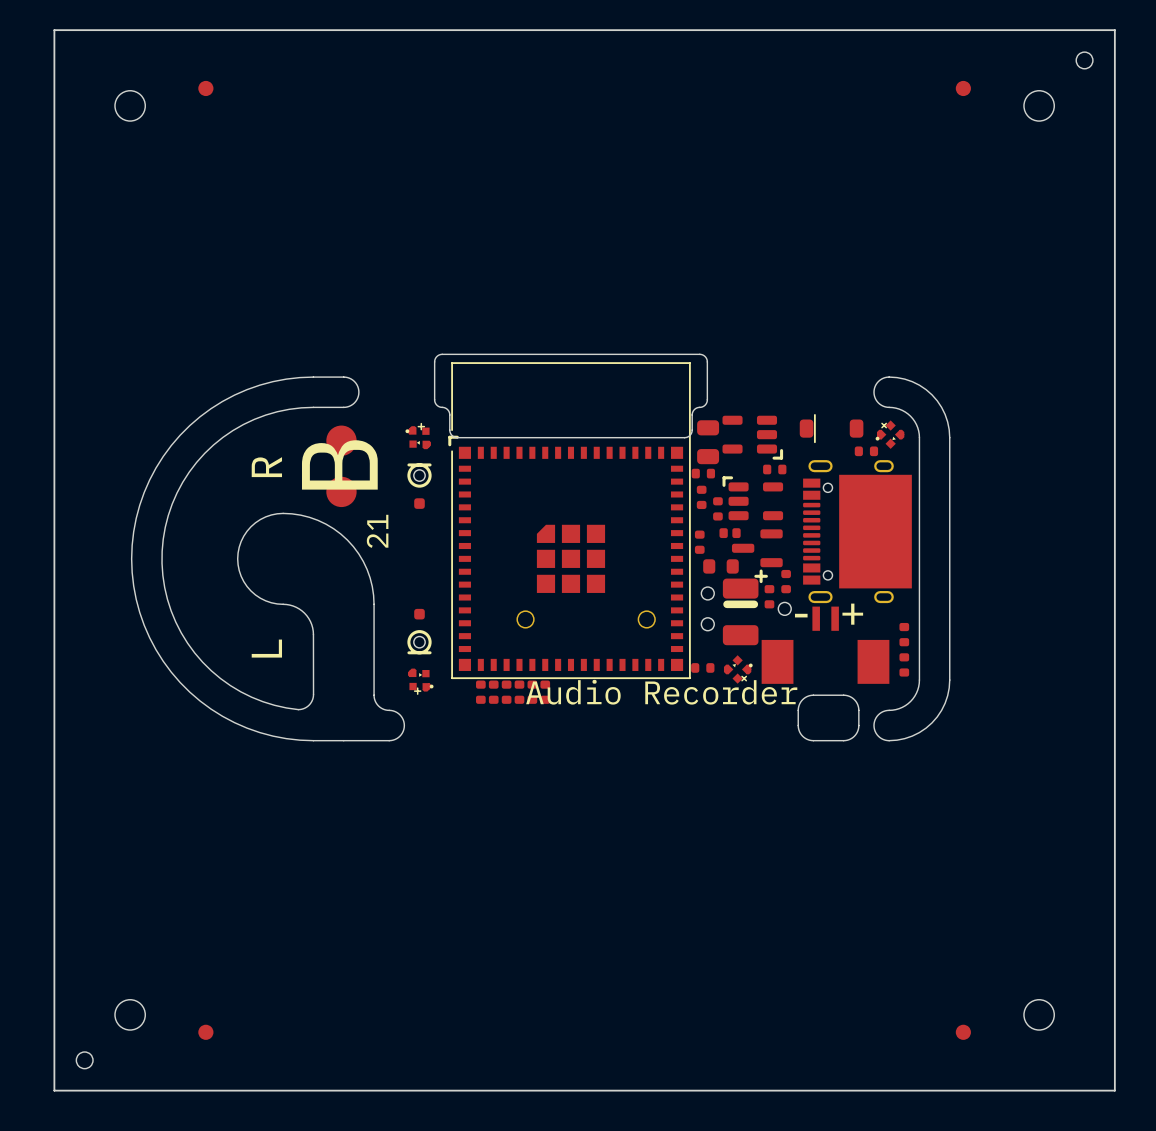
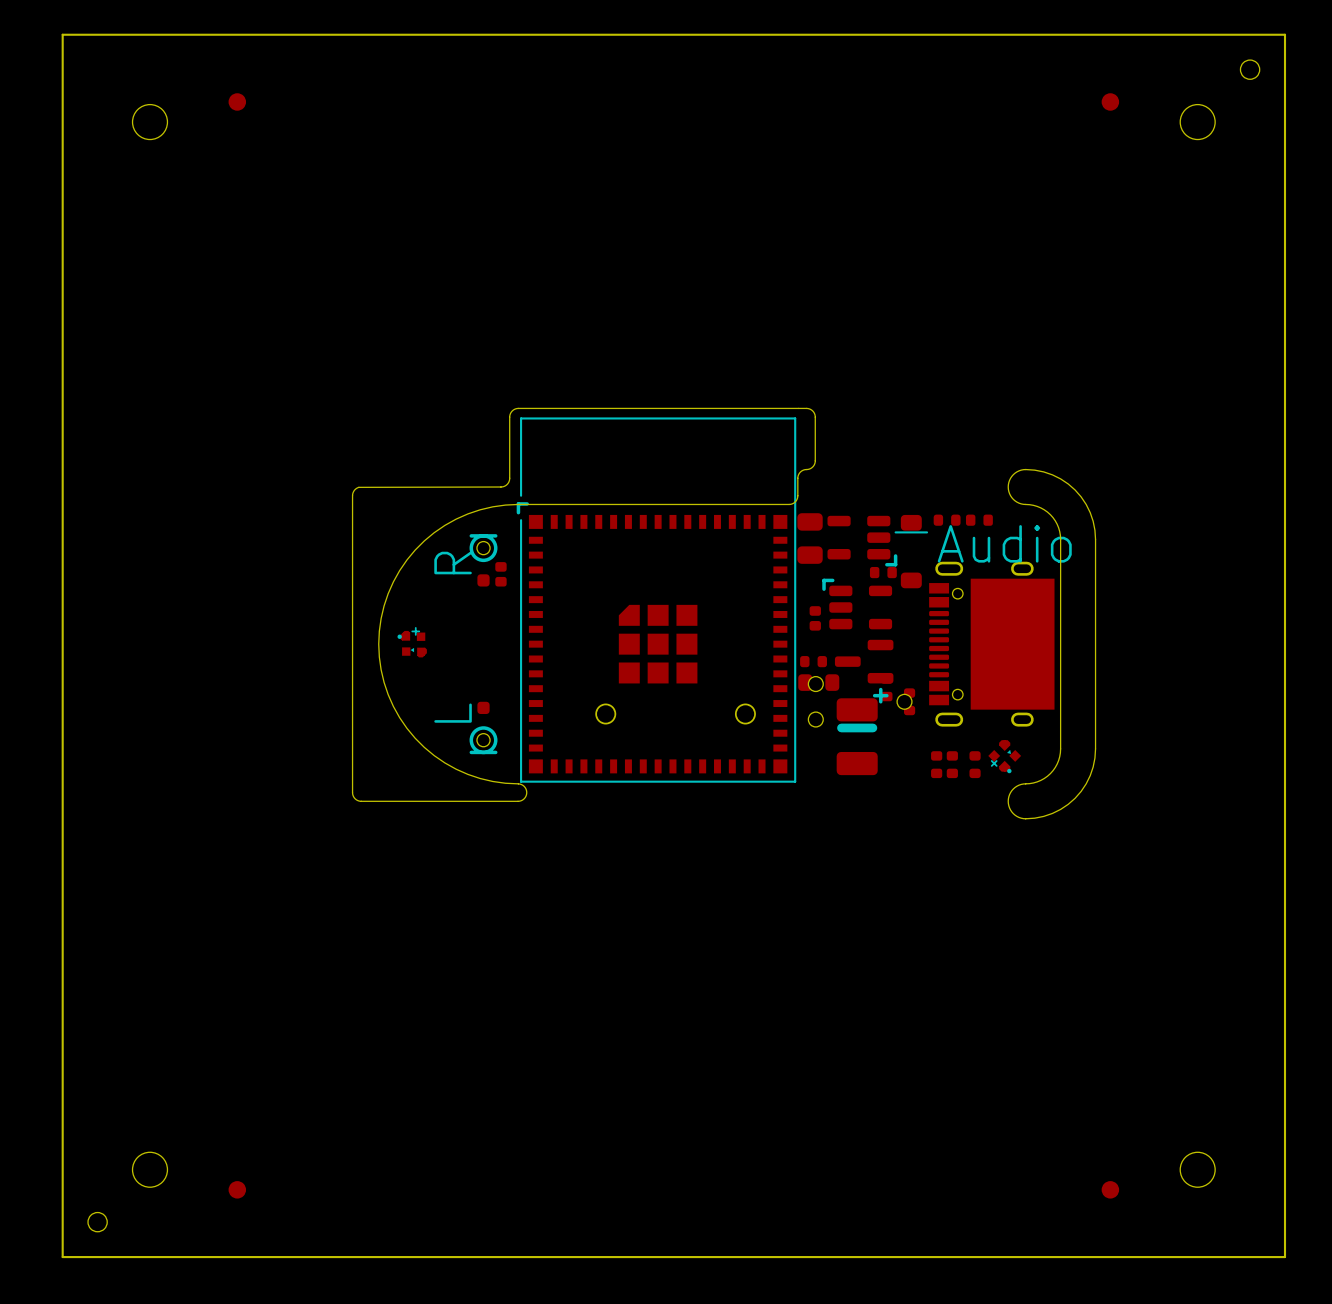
board edge: (449, 354) (439, 354) (434, 359) (434, 400) (437, 405) (448, 411) (450, 432) (452, 436) (457, 437) -> (518, 408) (513, 410) (509, 416) (509, 478) (505, 485) (358, 487) (353, 492) (352, 792) (356, 800) (518, 801) (525, 797) (526, 789) (521, 784) (492, 781) (467, 774) (444, 762) (415, 738) (399, 717) (388, 694) (381, 669) (378, 644) (384, 605) (393, 581) (406, 559) (424, 540) (444, 525) (467, 513) (492, 506) (527, 504)
board edge: (313, 377) (343, 377) (351, 379) (358, 388) (356, 399) (352, 404) (345, 407) (301, 407) (265, 415) (232, 430) (204, 453) (182, 482) (168, 515) (162, 551) (164, 587) (171, 610) (181, 632) (194, 653) (211, 670) (230, 685) (251, 697) (274, 705) (303, 708) (310, 703) (313, 696) (313, 634) (310, 621) (304, 613) (296, 607) (265, 600) (251, 591) (241, 576) (238, 564) (238, 552) (241, 541) (251, 526) (260, 519) (271, 514) (283, 513) (300, 515) (317, 520) (333, 528) (353, 546) (363, 561) (370, 577) (374, 604) (374, 698) (381, 708) (398, 713) (404, 723) (401, 734) (393, 740) (313, 740) (286, 738) (247, 728) (222, 716) (189, 692) (171, 672) (149, 637) (136, 599) (131, 558) (136, 518) (149, 479) (171, 445) (200, 416) (234, 395) (272, 381) (313, 377) -> none
board edge: (889, 377) (881, 379) (876, 384) (873, 392) (876, 399) (883, 406) (899, 409) (908, 413) (916, 424) (919, 437) (919, 683) (916, 693) (908, 703) (899, 708) (883, 711) (876, 717) (873, 725) (876, 733) (881, 738) (889, 740) (912, 736) (931, 722) (945, 703) (949, 680) (949, 437) (947, 421) (937, 400) (926, 389) (904, 379) (889, 377) -> (1025, 469) (1016, 471) (1010, 478) (1008, 487) (1010, 495) (1019, 503) (1037, 506) (1047, 512) (1057, 524) (1060, 539) (1060, 752) (1055, 767) (1047, 776) (1037, 781) (1019, 785) (1010, 792) (1008, 801) (1010, 810) (1016, 816) (1025, 818) (1052, 813) (1075, 798) (1090, 775) (1095, 748) (1095, 539) (1093, 521) (1086, 504) (1068, 483) (1052, 474) (1025, 469)
part rotation: 0° (831, 428) -> 90° clockwise (911, 551)
part position: (831, 428) -> (911, 551)
part: (889, 434) -> none
part: (418, 435) -> none
part: (752, 437) -> none
part: (708, 442) -> none
part: none -> (979, 520)
part position: (866, 451) -> (947, 520)
part: (341, 466) -> none
text position: R (266, 467) -> R (453, 563)
part footprint: [691, 468, 716, 479] -> [797, 513, 823, 564]
part: none -> (862, 541)
part position: (774, 469) -> (883, 572)
text: none -> Audio (1004, 543)
part: (701, 497) -> none
part: (752, 498) -> none
part: (717, 508) -> none
part: none -> (857, 603)
part footprint: [694, 530, 705, 554] -> [809, 606, 821, 631]
text: 21 (377, 531) -> none
part position: (857, 531) -> (991, 644)
part rotation: 0° (730, 533) -> 90° clockwise (500, 574)
part position: (730, 533) -> (500, 574)
part position: (757, 548) -> (864, 661)
part: none -> (412, 642)
part position: (720, 566) -> (818, 682)
part: none -> (813, 661)
part position: (786, 581) -> (909, 701)
part position: (745, 607) -> (862, 731)
text: + (852, 614) -> none
text: - (801, 615) -> none
part: (904, 634) -> none
part: (825, 645) -> none
text position: L (266, 648) -> L (453, 713)
part: none -> (1004, 756)
part: none -> (936, 764)
part: none -> (952, 764)
part: none -> (975, 764)
part: (904, 664) -> none
part: (702, 667) -> none
part: (738, 669) -> none
part: (420, 681) -> none
part: (480, 692) -> none
part: (493, 692) -> none
part: (506, 692) -> none
part: (519, 692) -> none
part: (532, 692) -> none
part: (545, 692) -> none
text: Audio Recorder (661, 692) -> none
board edge: (813, 695) (845, 695) (854, 699) (858, 710) (858, 728) (854, 736) (845, 740) (813, 740) (802, 736) (798, 727) (798, 707) (803, 698) (813, 695) -> none

